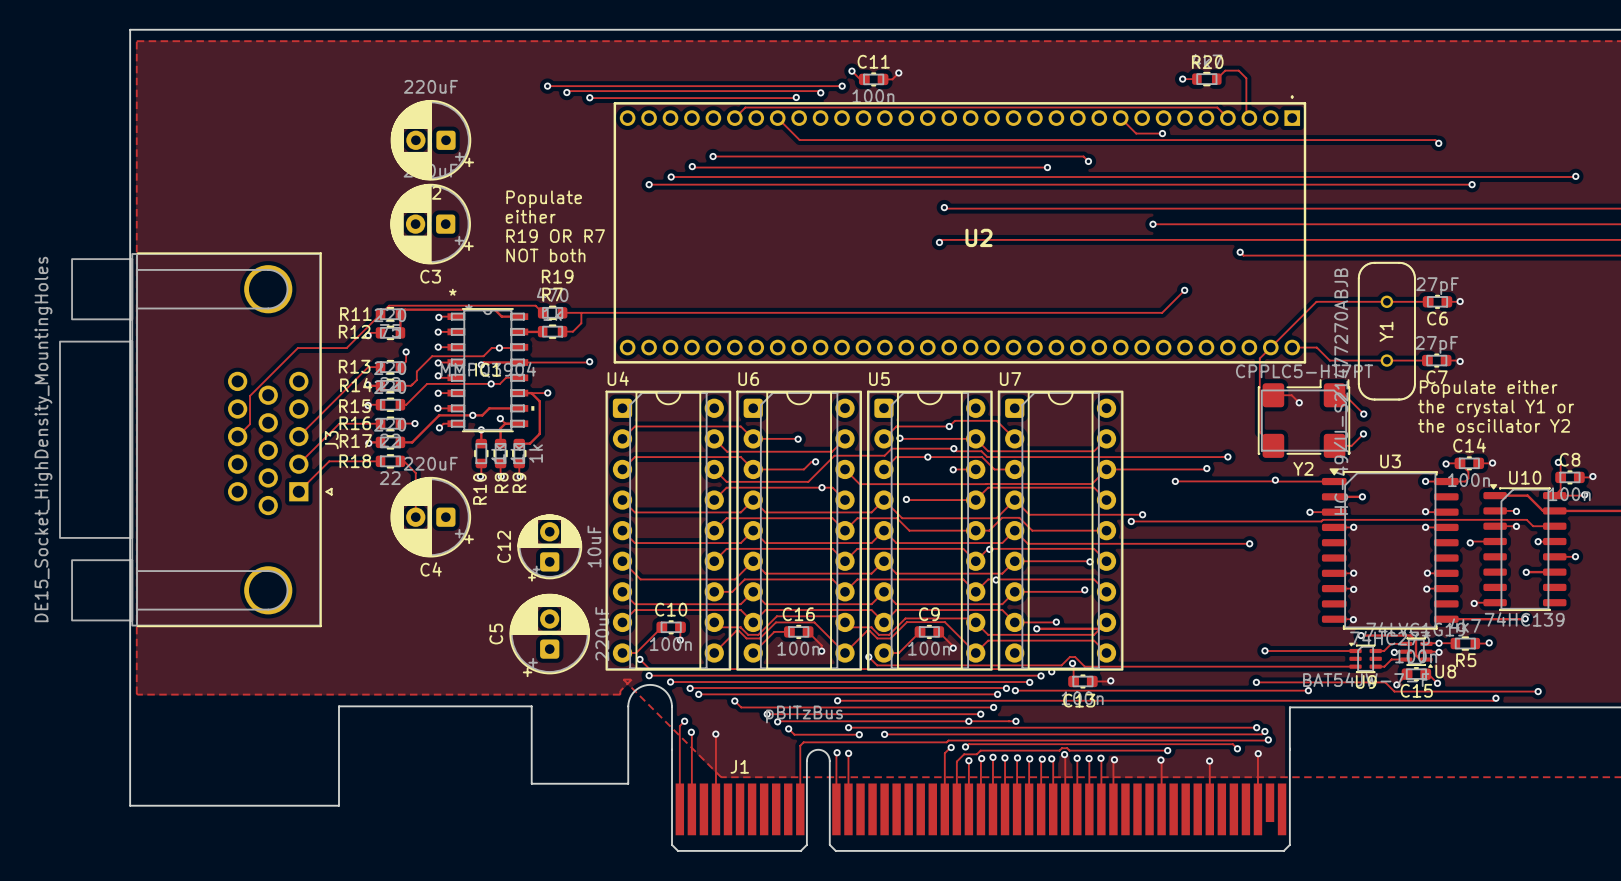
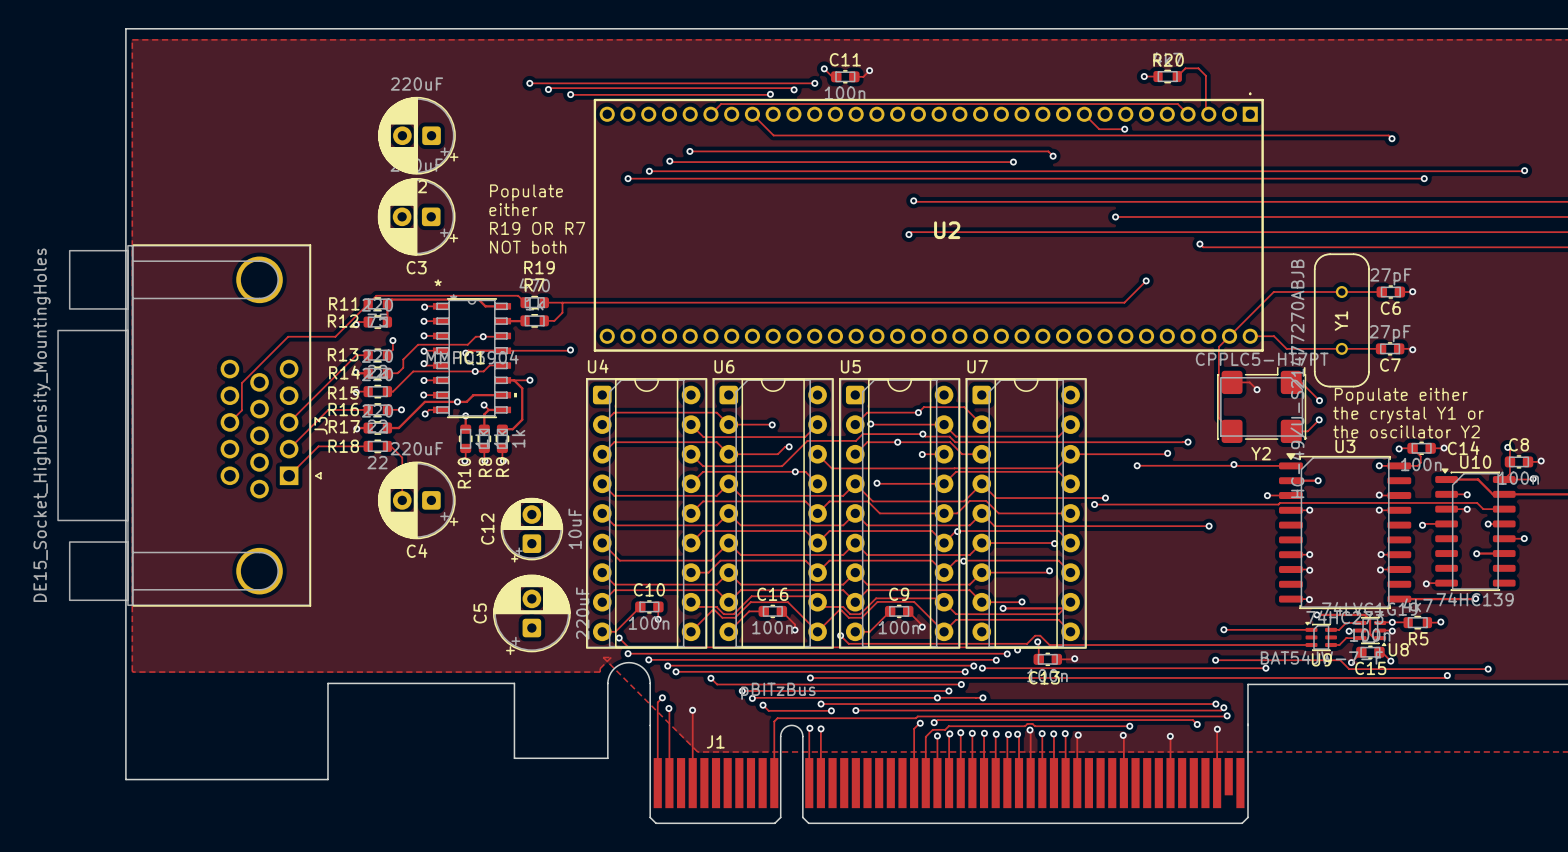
text position: Populate either (1488, 389) -> Populate either (1401, 396)
text position: the crystal Y1 or (1496, 408) -> the crystal Y1 or (1408, 415)
text position: the oscillator Y2 (1494, 425) -> the oscillator Y2 (1406, 431)
C14 name position: C14 (1469, 445) -> C14 (1463, 448)

